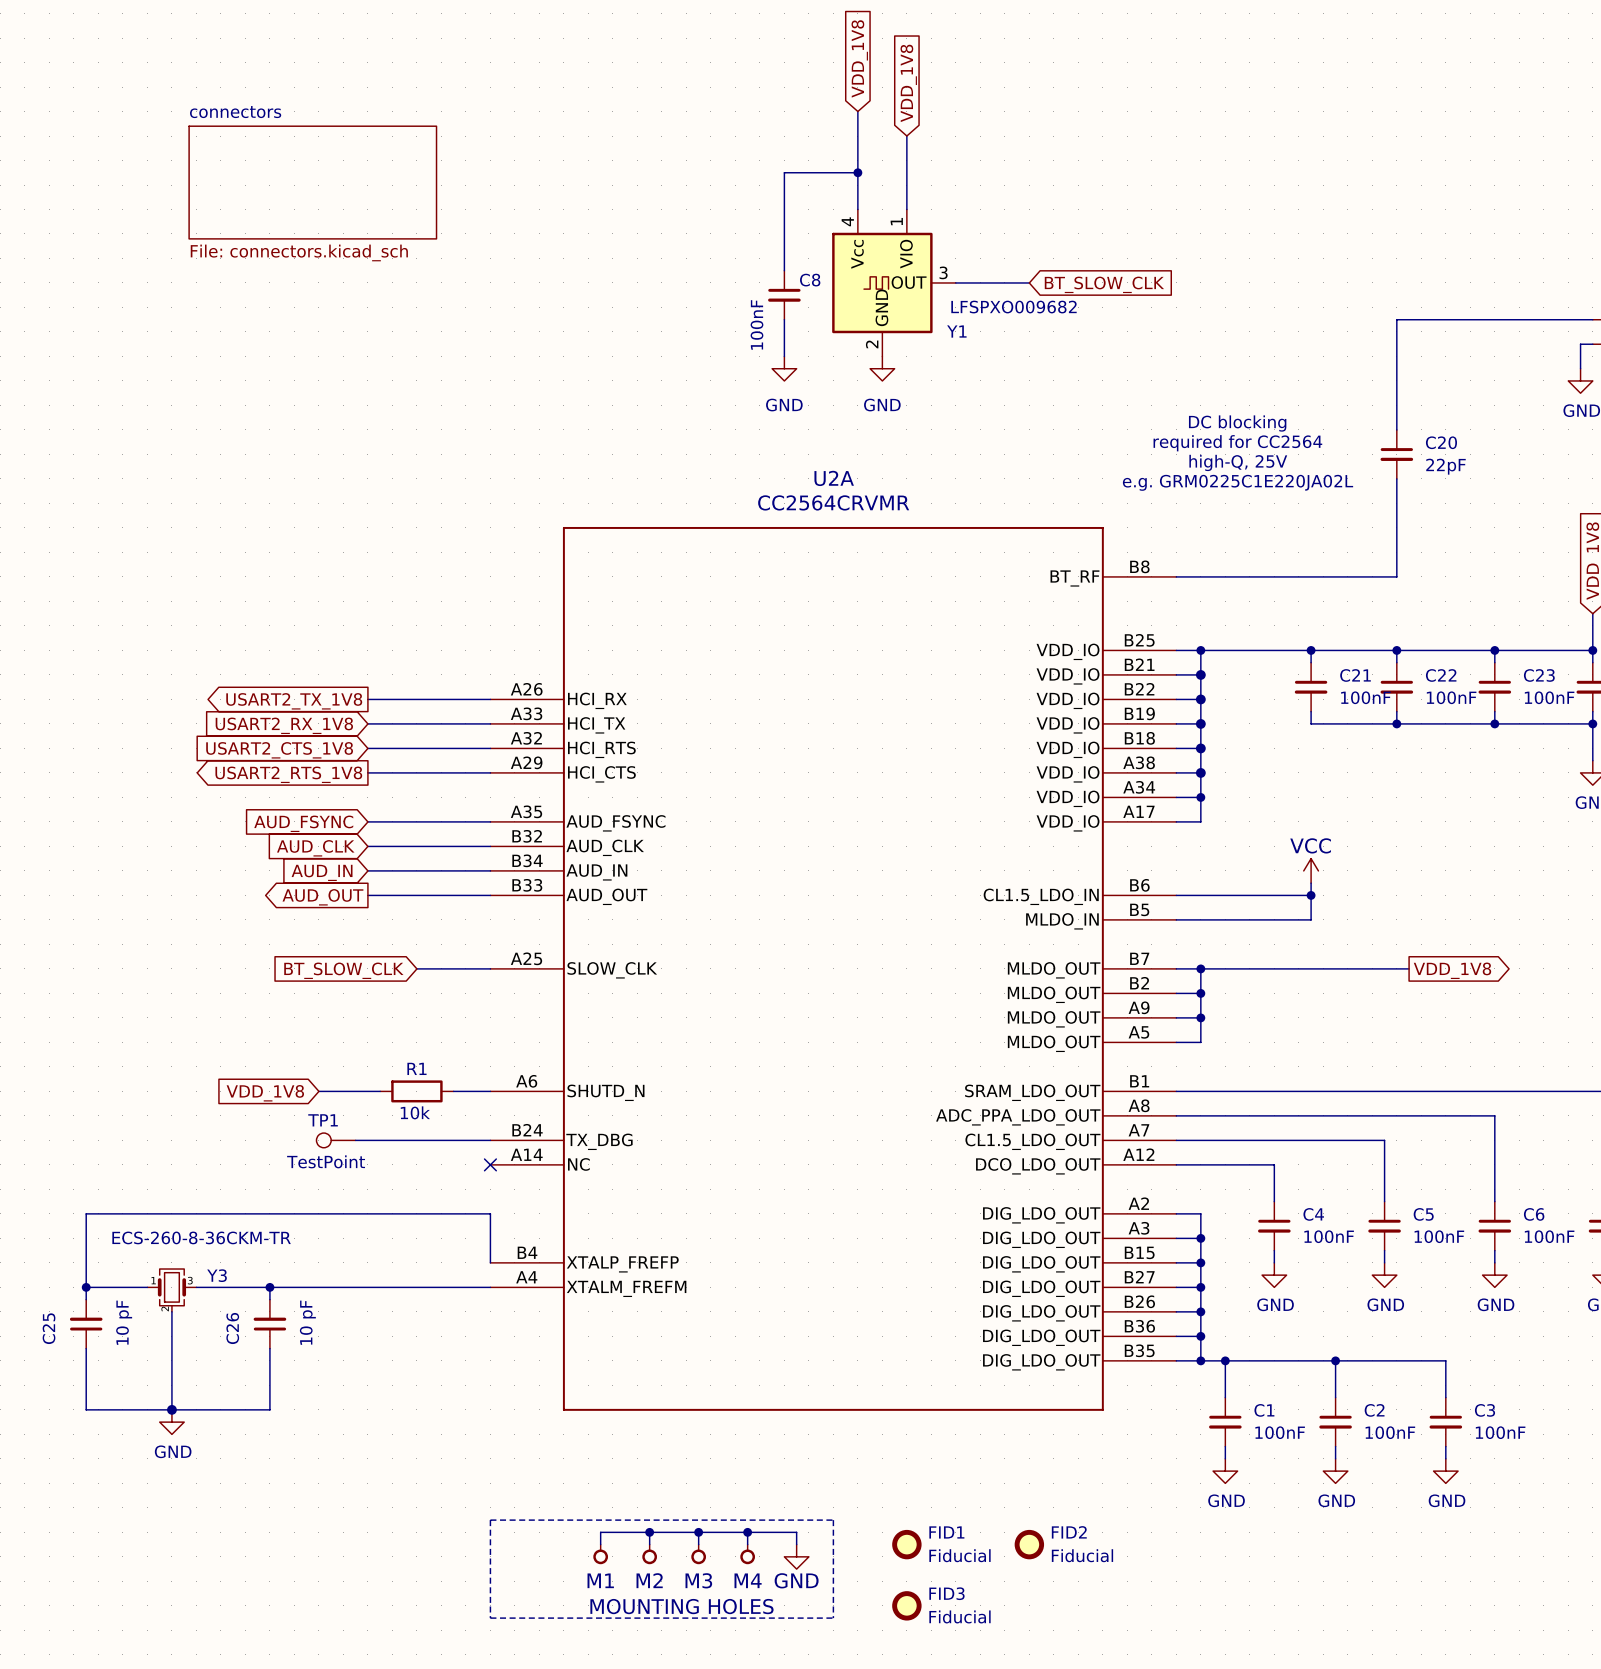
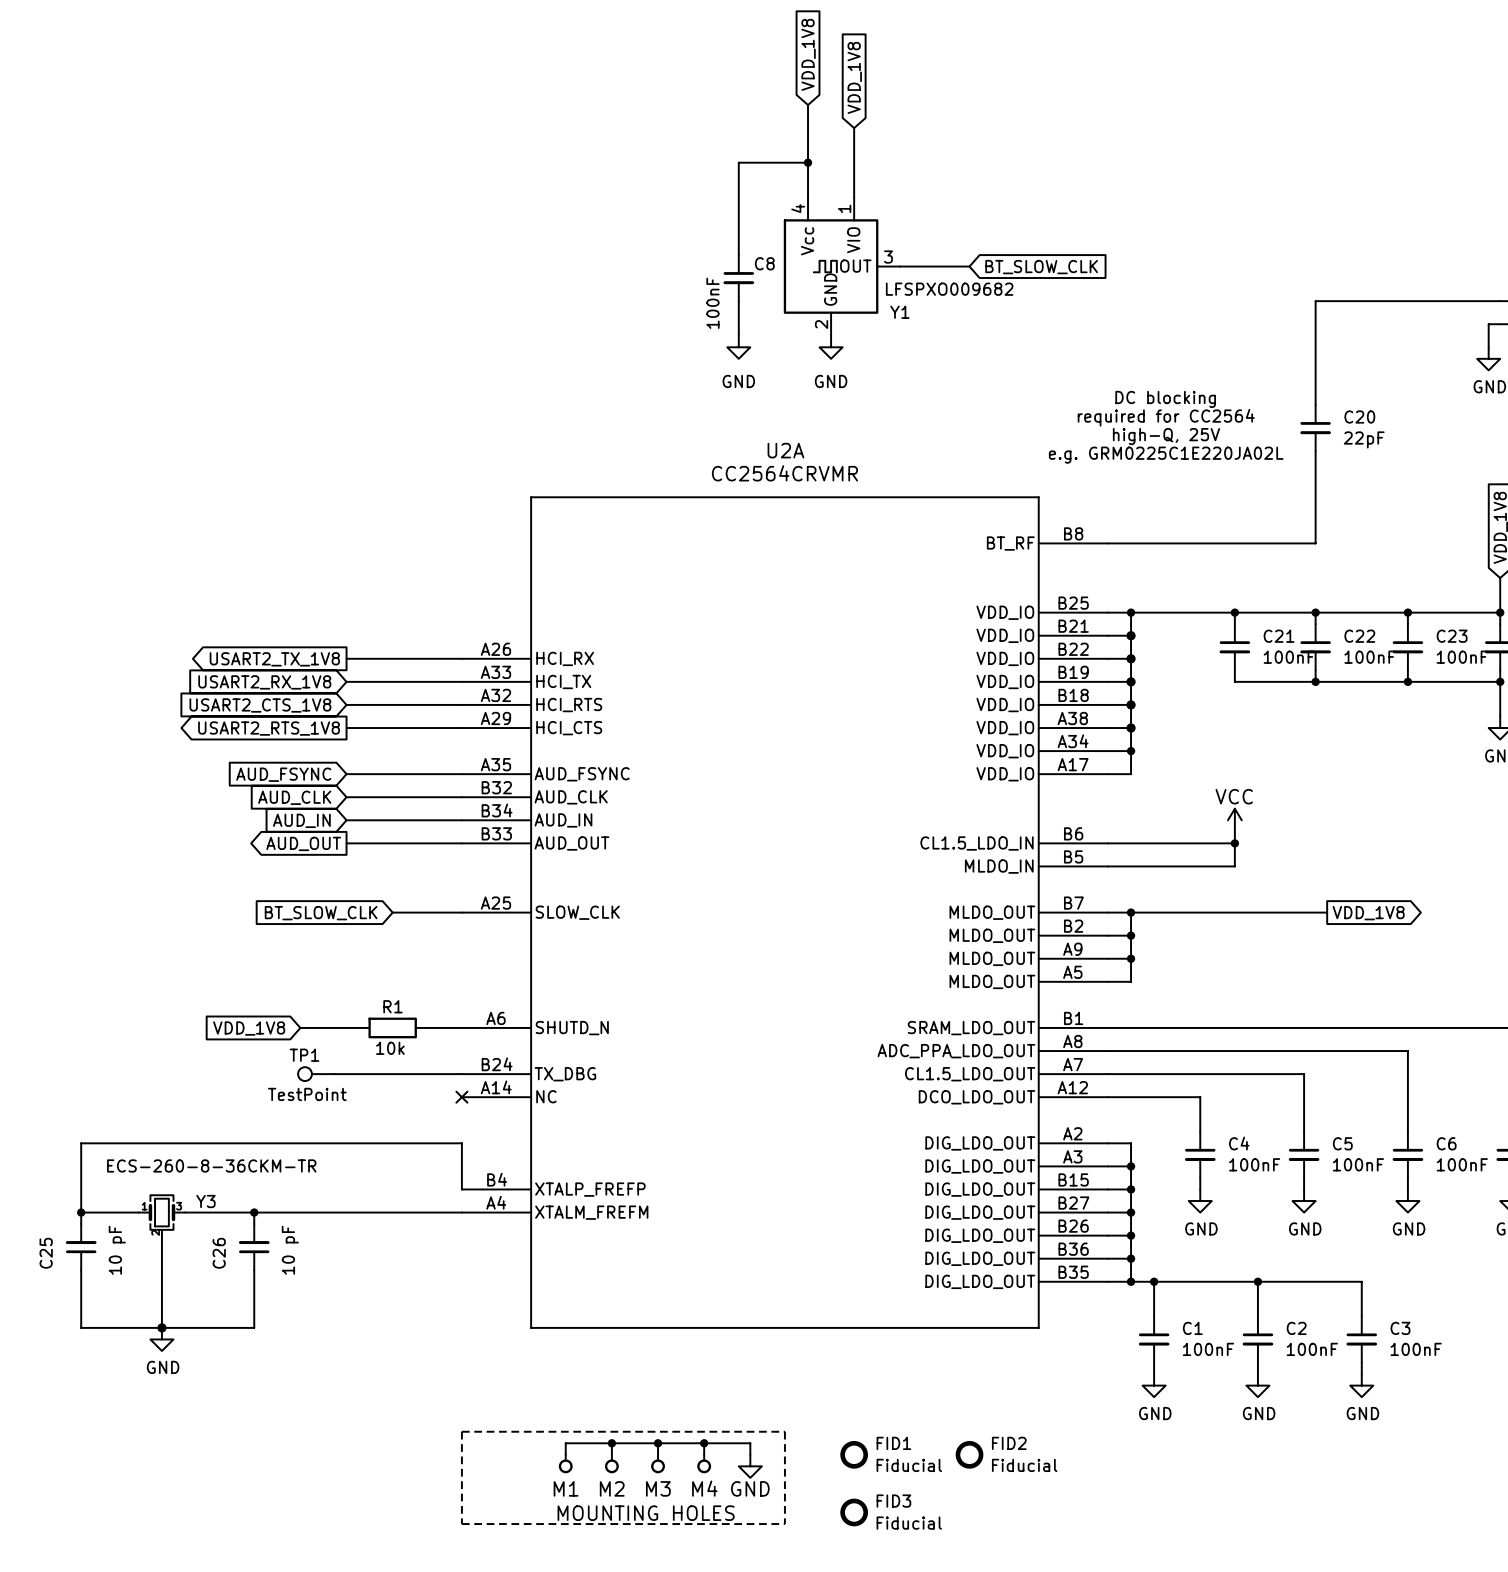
sheet connectors: File: connectors.kicad_sch (312, 182) -> none

